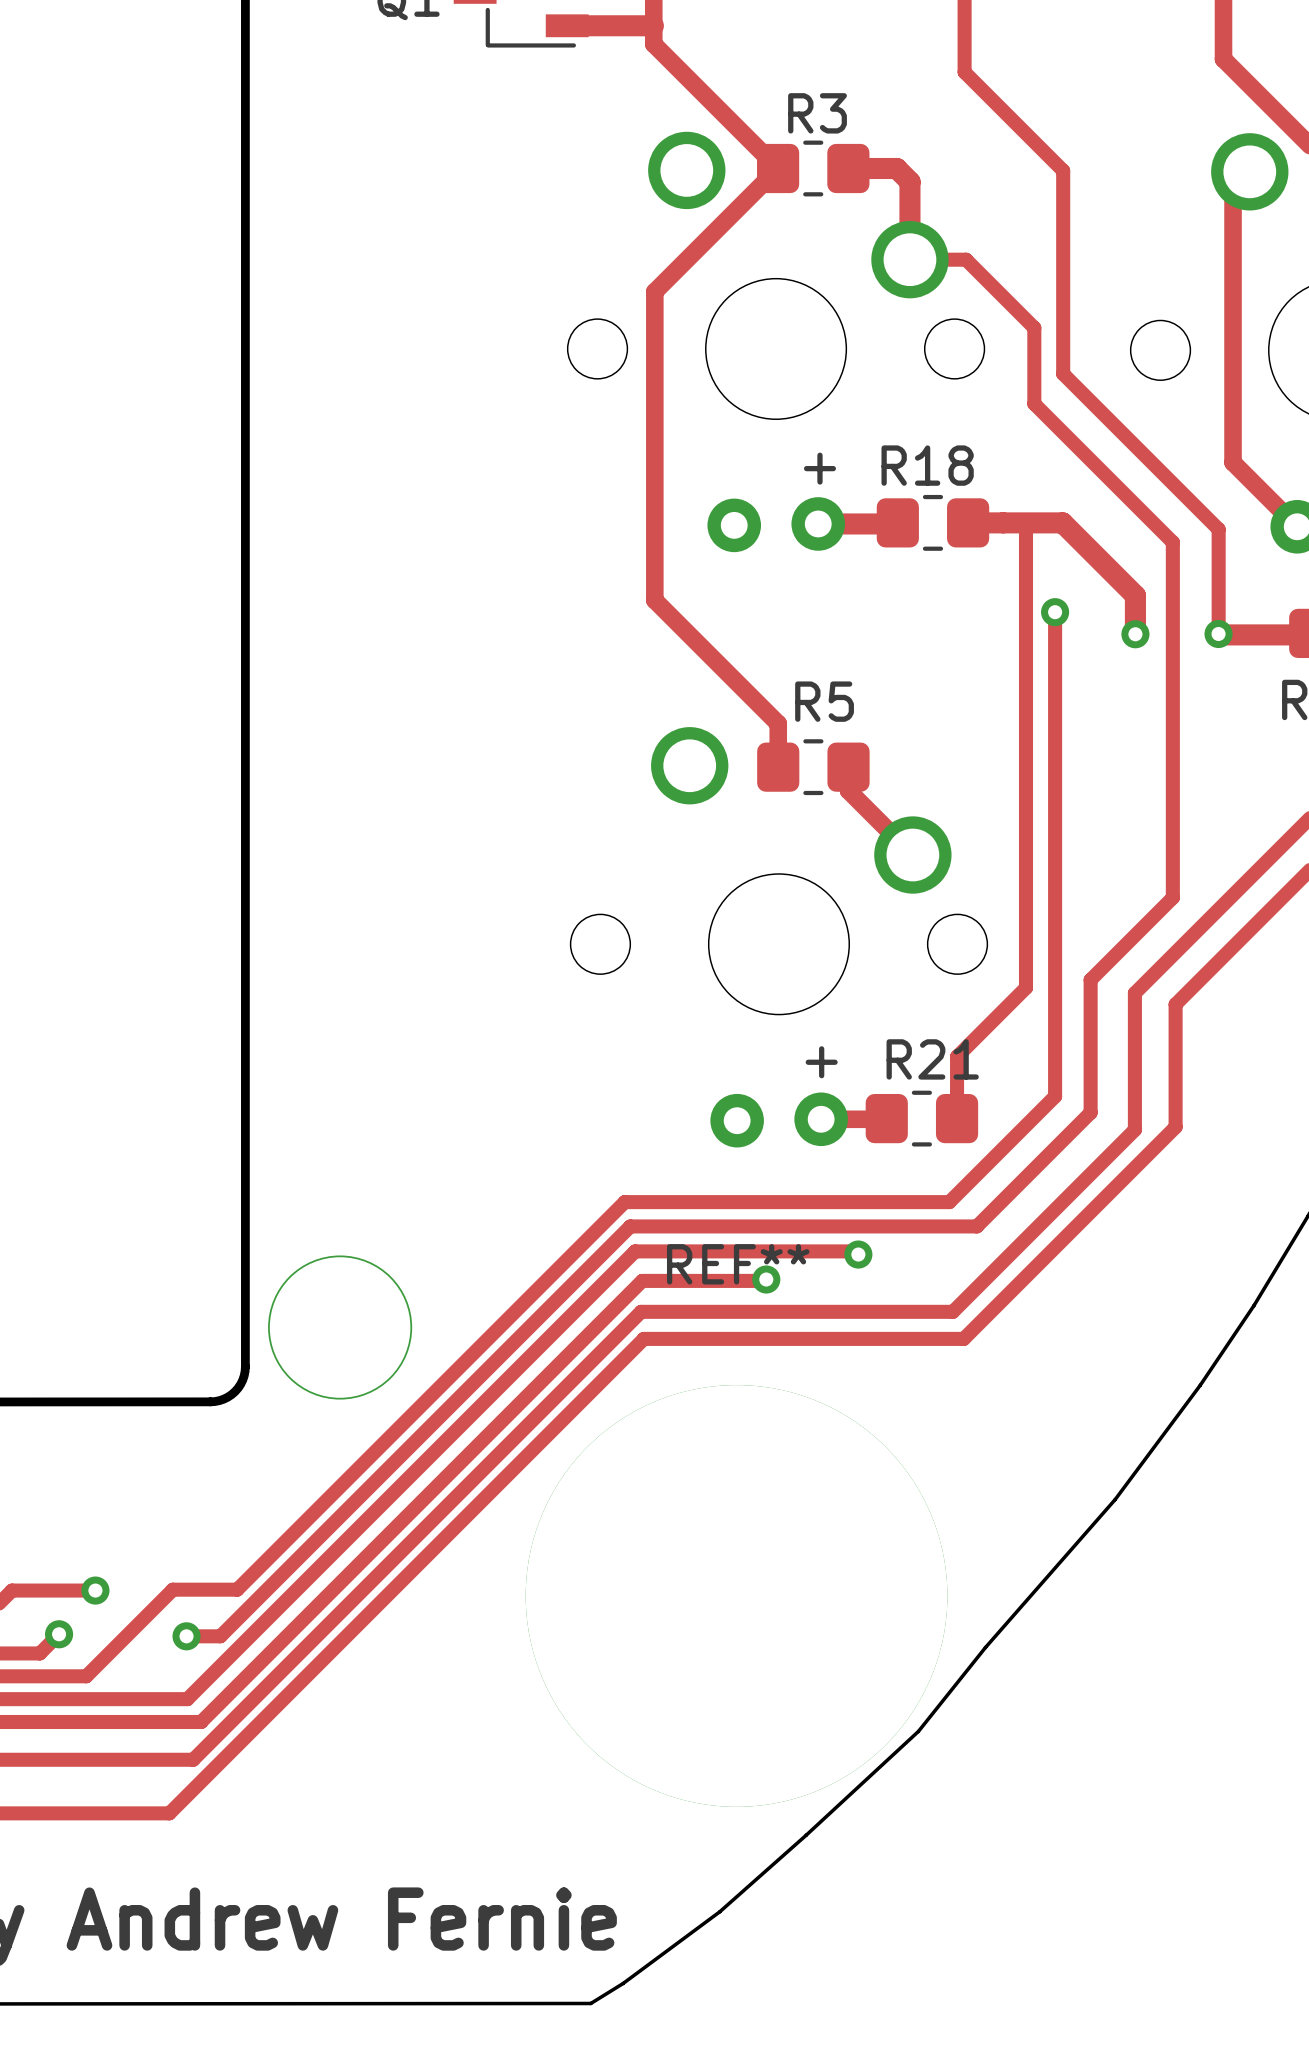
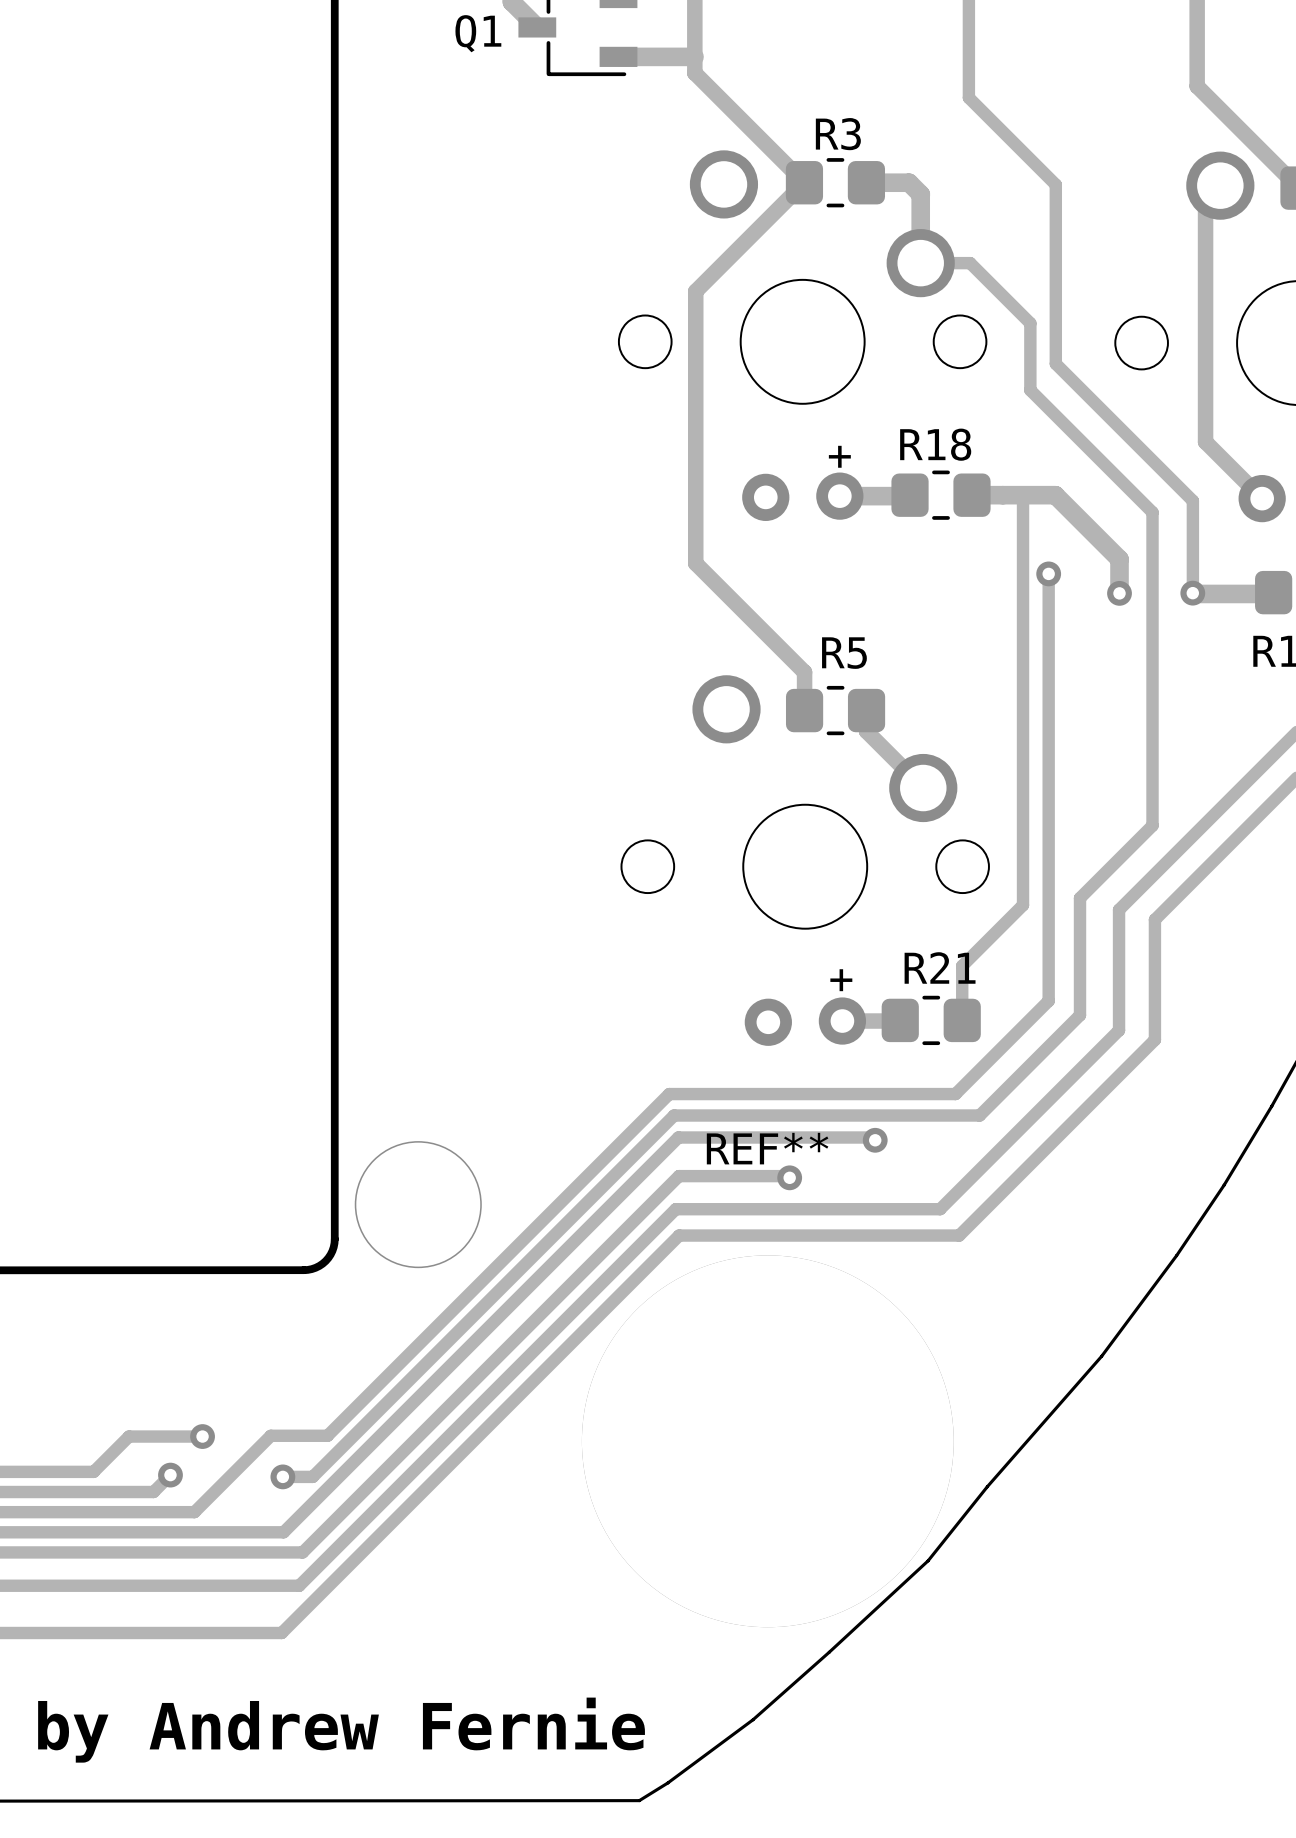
track: (1175, 1127) (963, 1338) (643, 1338) (169, 1813) -> (1154, 1027) (1154, 1039) (959, 1235) (679, 1235) (281, 1633) (267, 1633)
track: (766, 1279) (642, 1280) (201, 1721) -> (789, 1177) (787, 1176) (678, 1176) (302, 1552) (295, 1552)
via position: (766, 1279) -> (789, 1177)
track: (952, 1311) (641, 1311) (193, 1759) -> (958, 1190) (940, 1209) (675, 1209) (299, 1585) (288, 1585)

